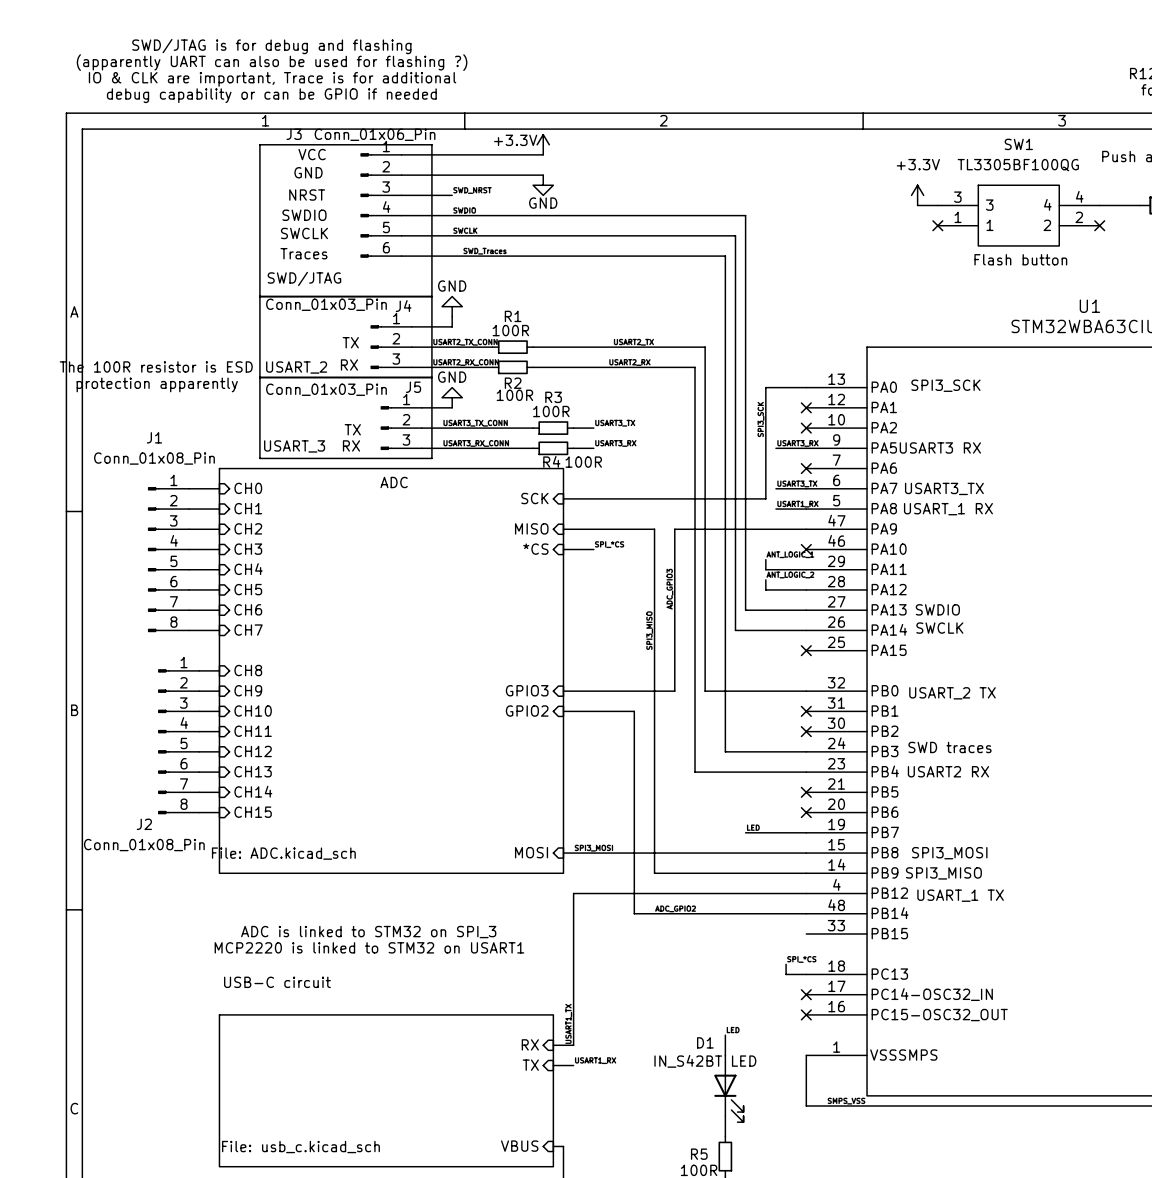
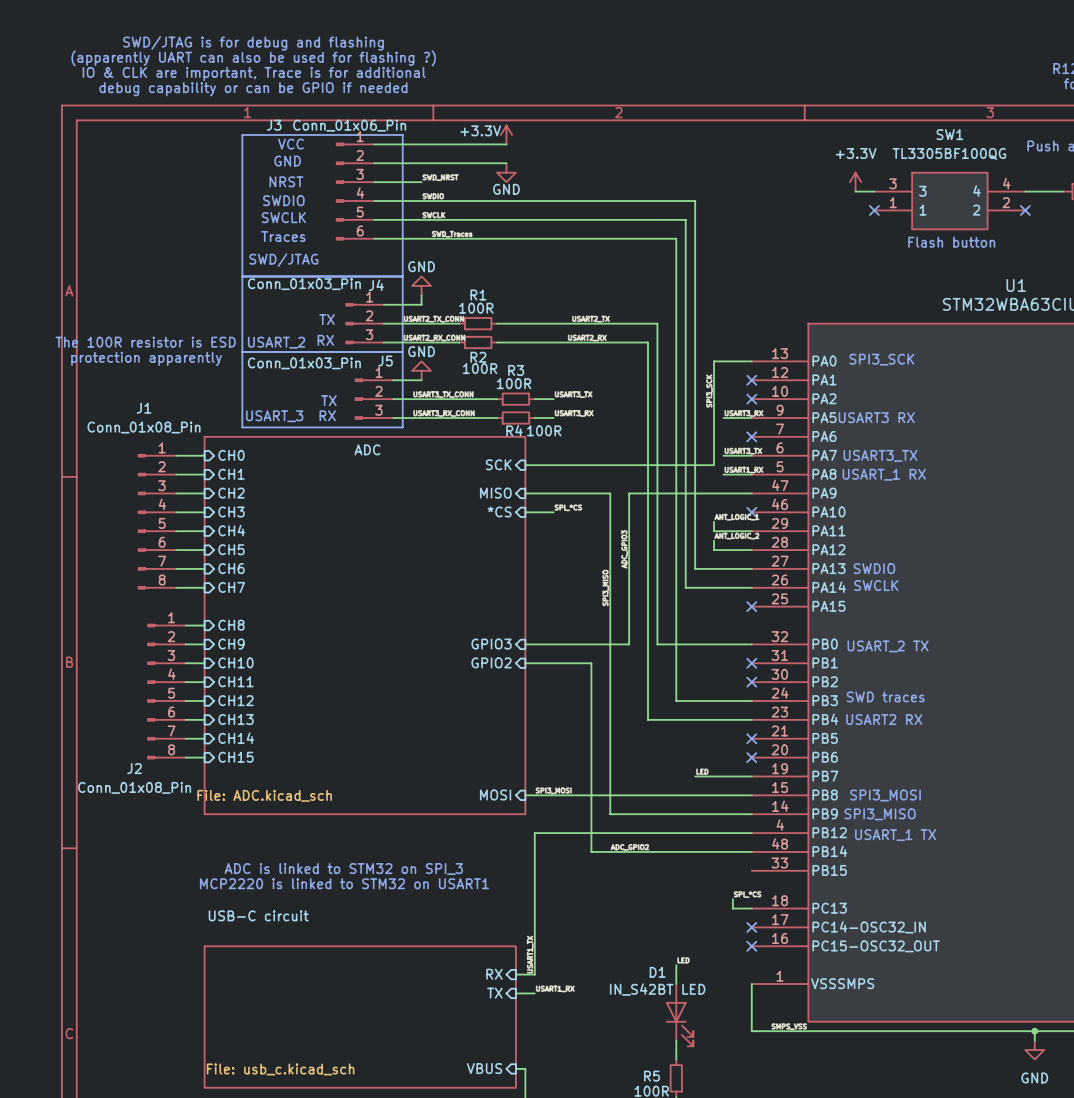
wire: none -> (1034, 1031) (1034, 1040)
junction: none -> (1034, 1031)
power symbol: none -> GND (1034, 1050)

